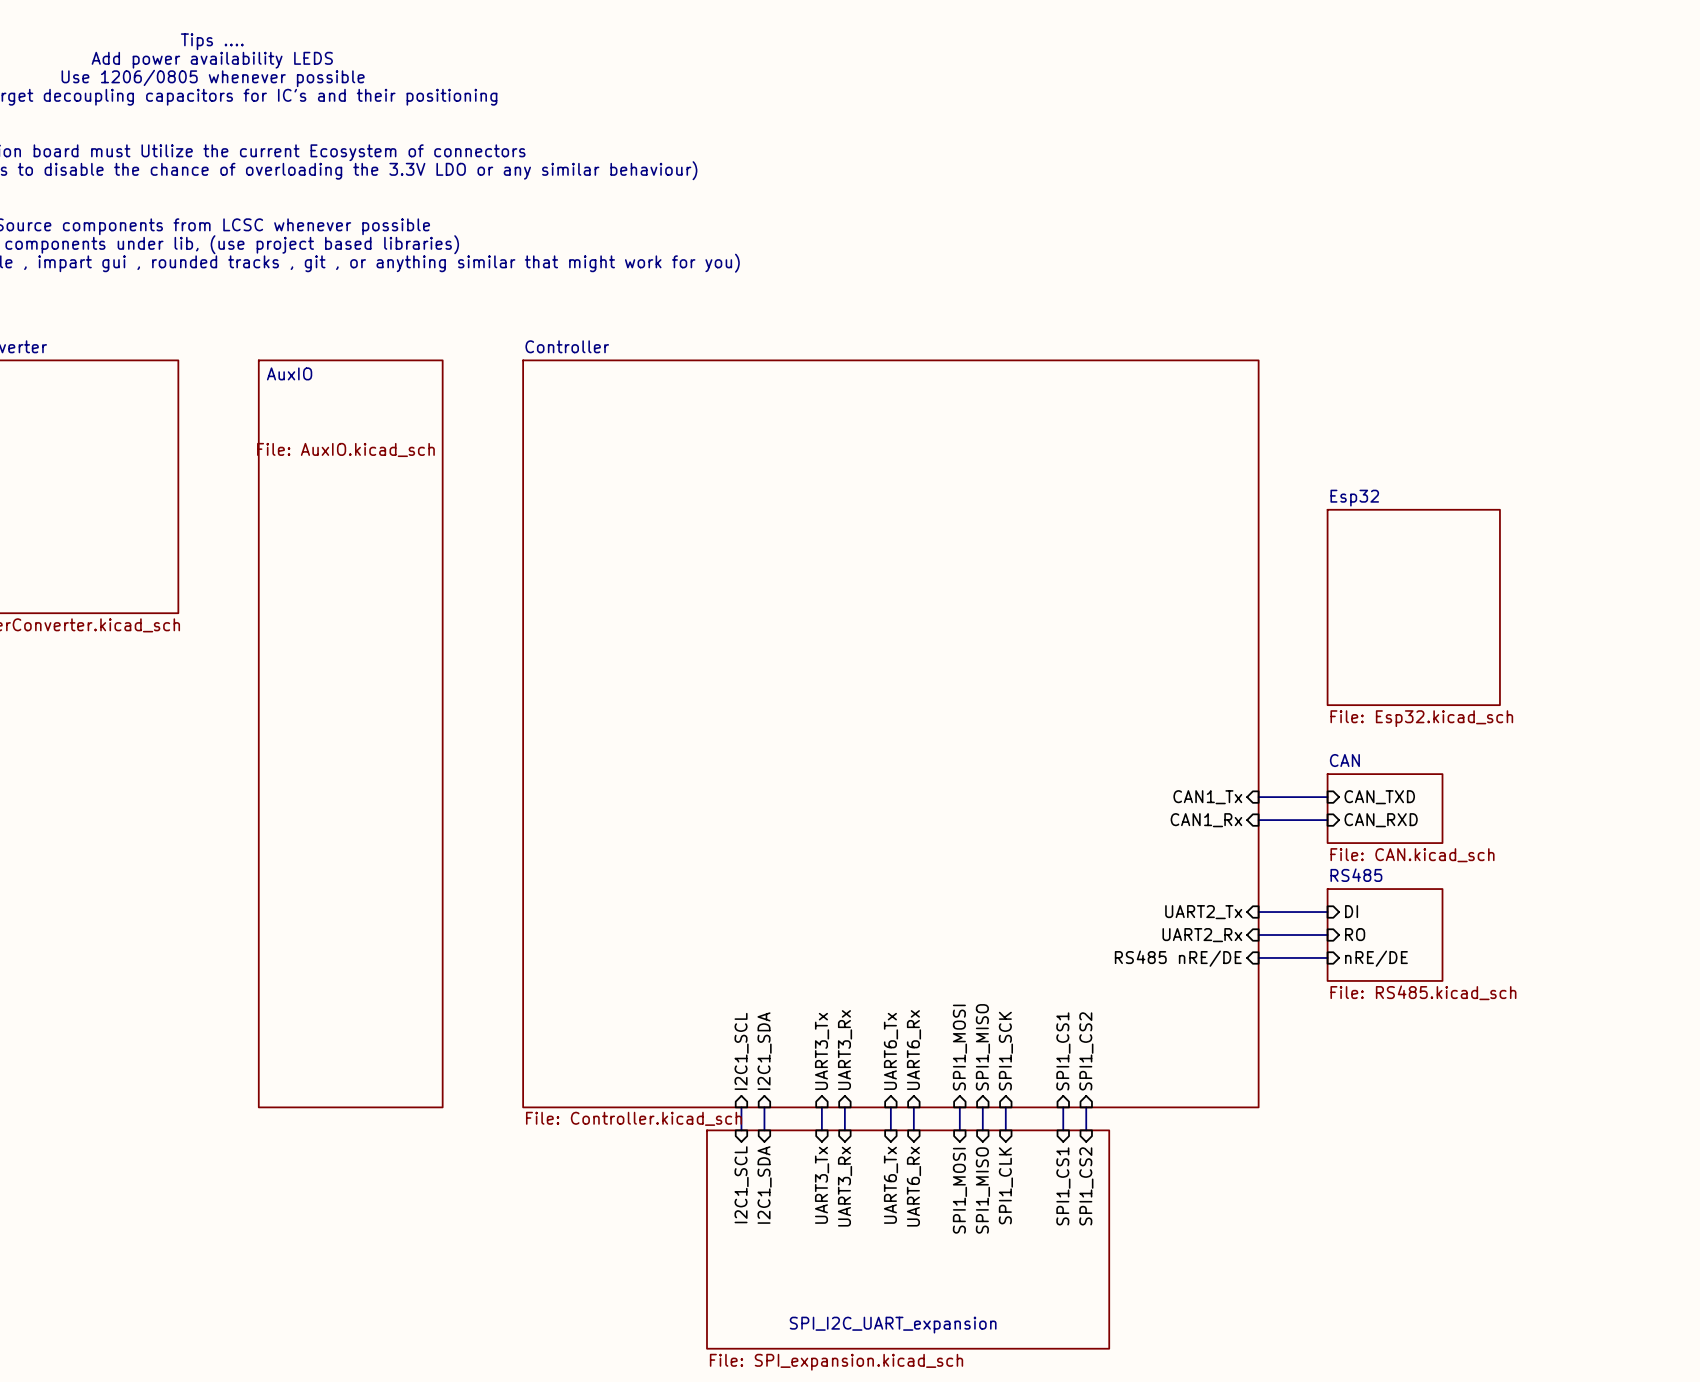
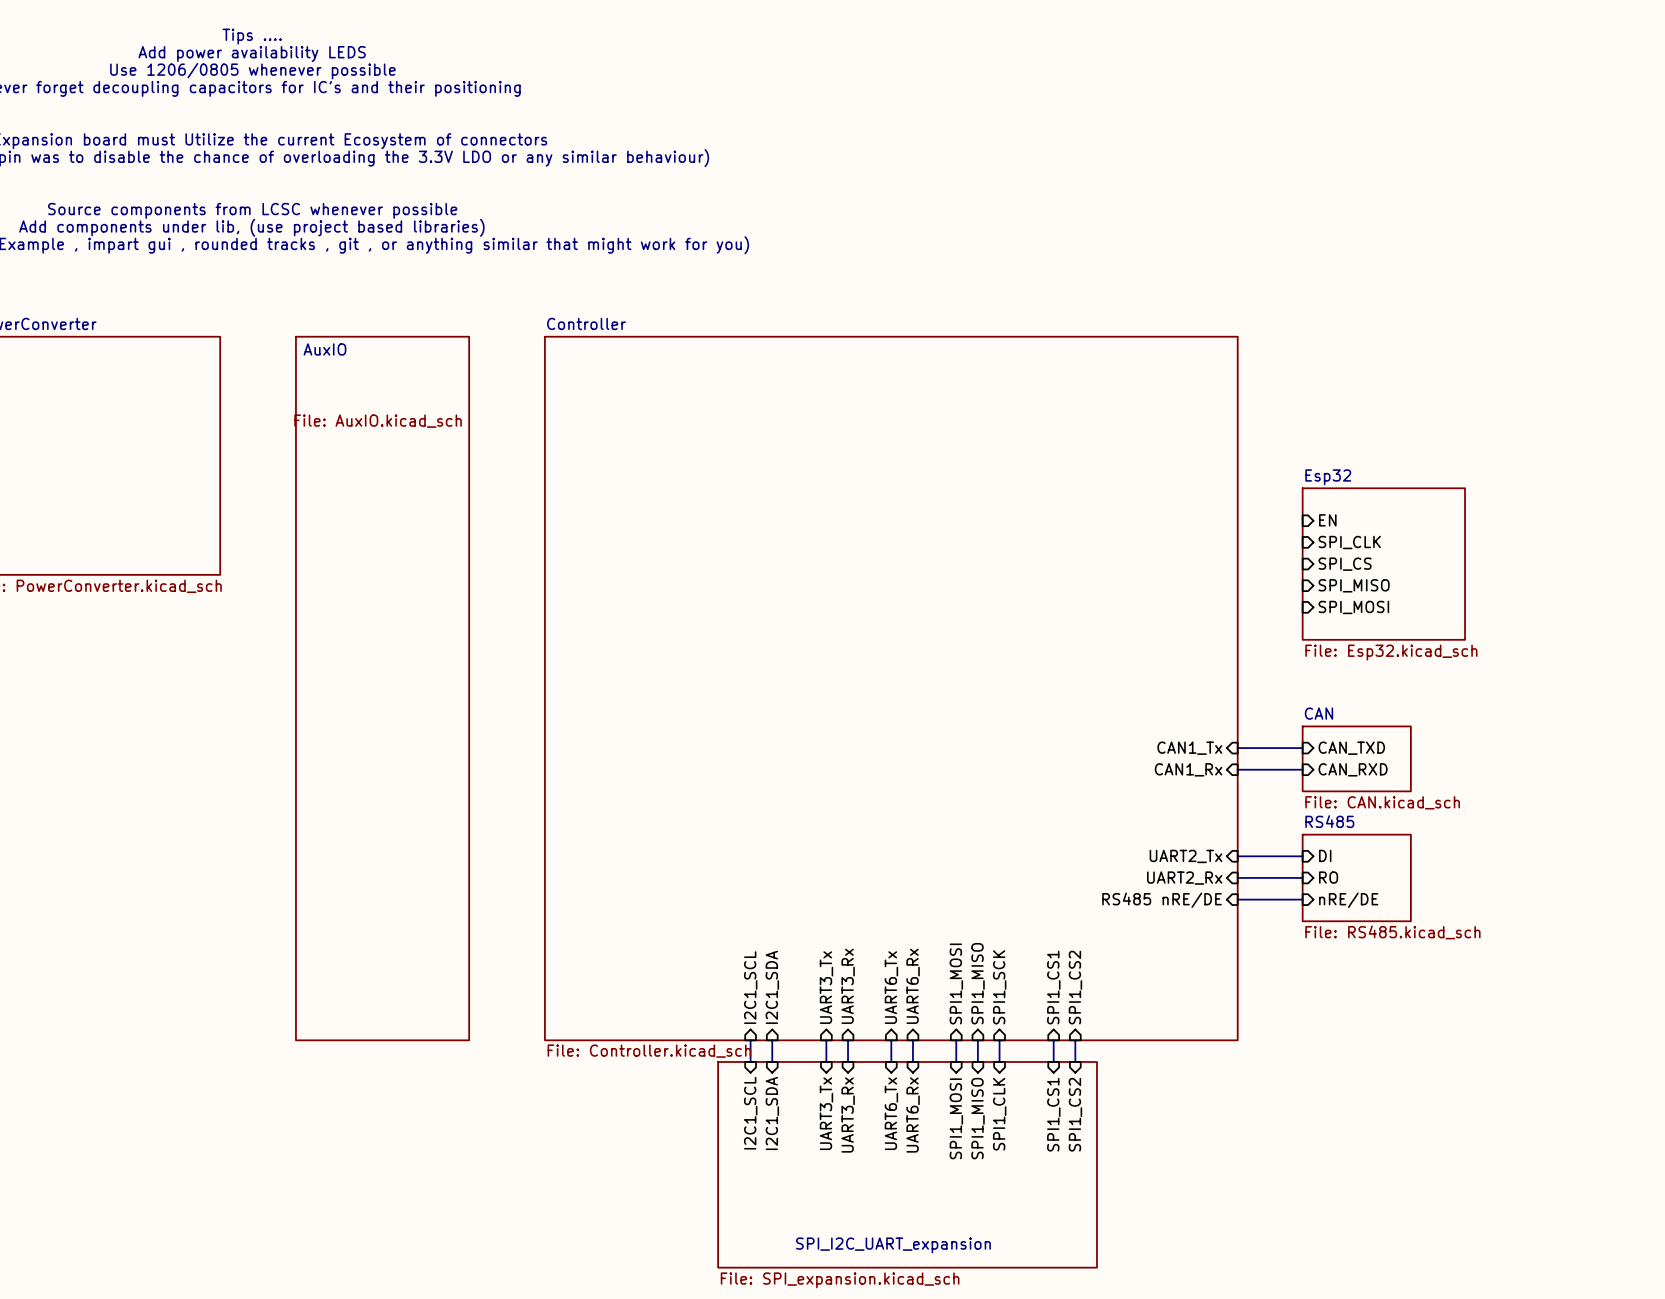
sheet Esp32 shape: [1326, 509, 1501, 706] -> [1302, 487, 1466, 641]
sheet pin: none -> EN (1327, 520)
sheet pin: none -> SPI_CLK (1349, 542)
sheet pin: none -> SPI_CS (1345, 564)
sheet pin: none -> SPI_MISO (1354, 585)
sheet pin: none -> SPI_MOSI (1353, 607)

